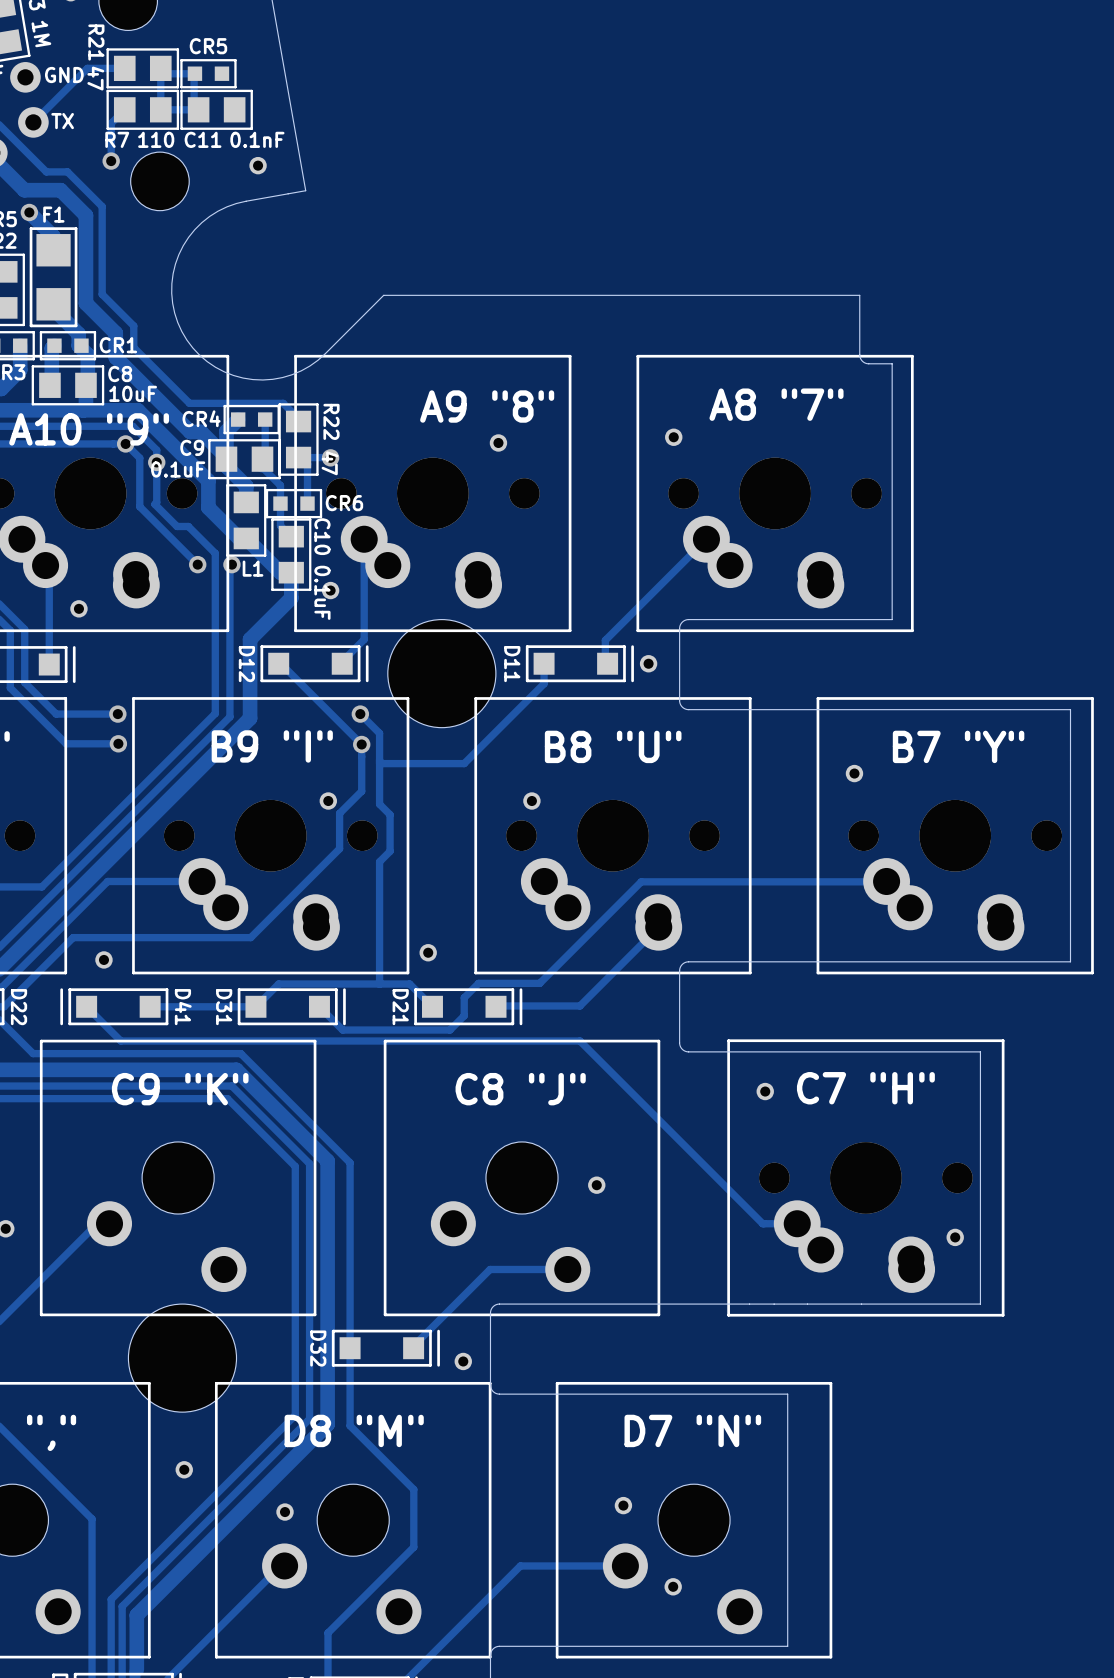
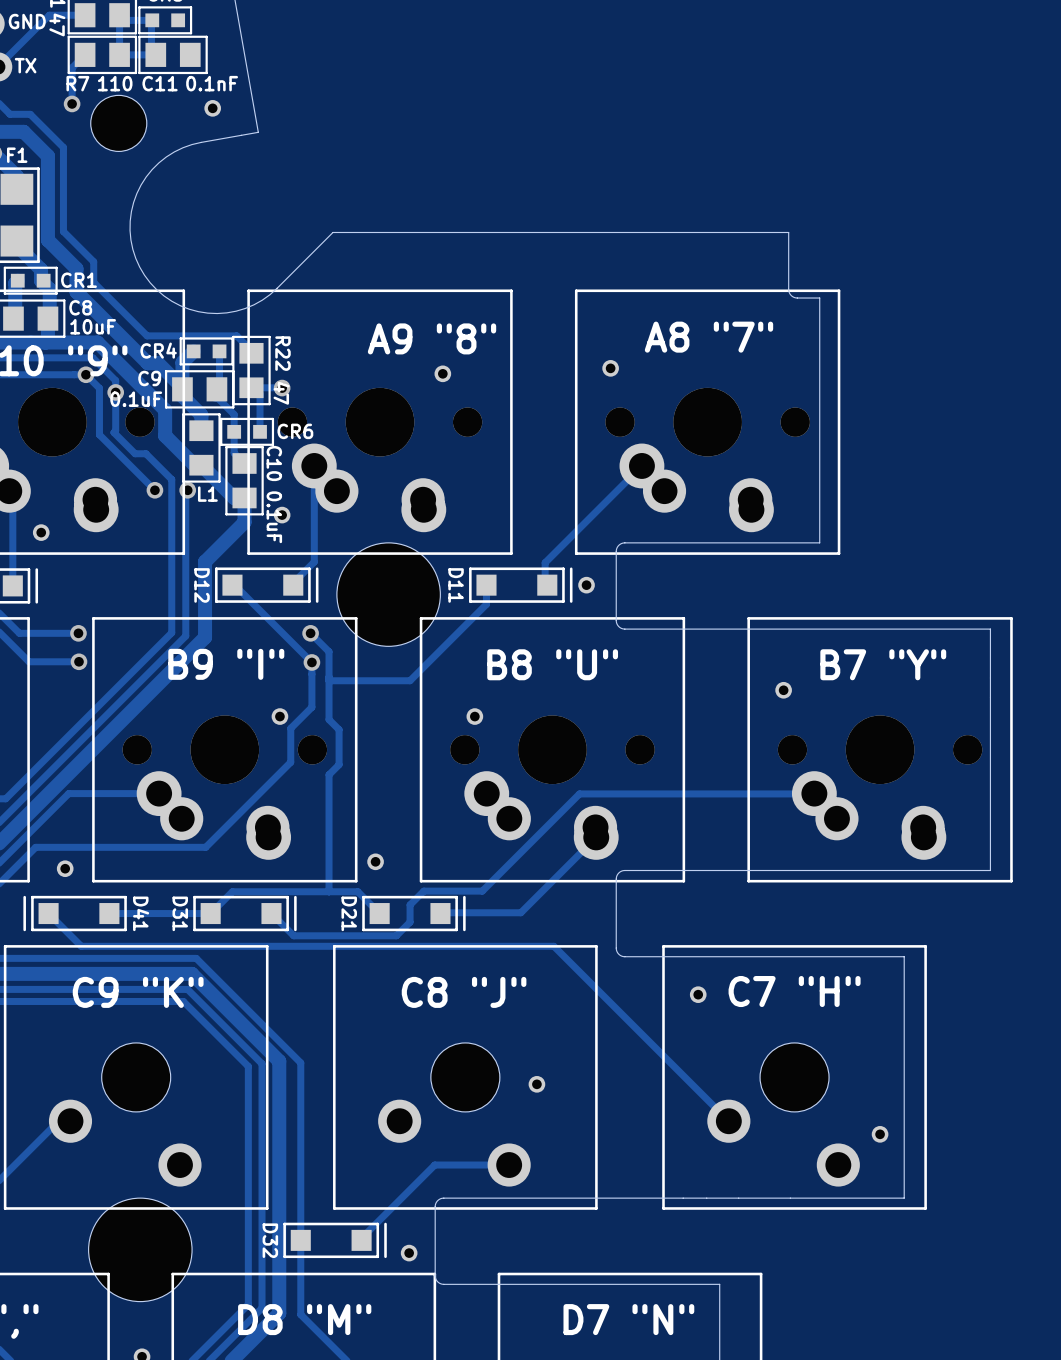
part footprint: [727, 1039, 1005, 1317] -> [662, 945, 927, 1210]
track: (579, 1041) (762, 1223) (797, 1223) (820, 1247) (820, 1250) -> (520, 946) (553, 946) (728, 1121)

